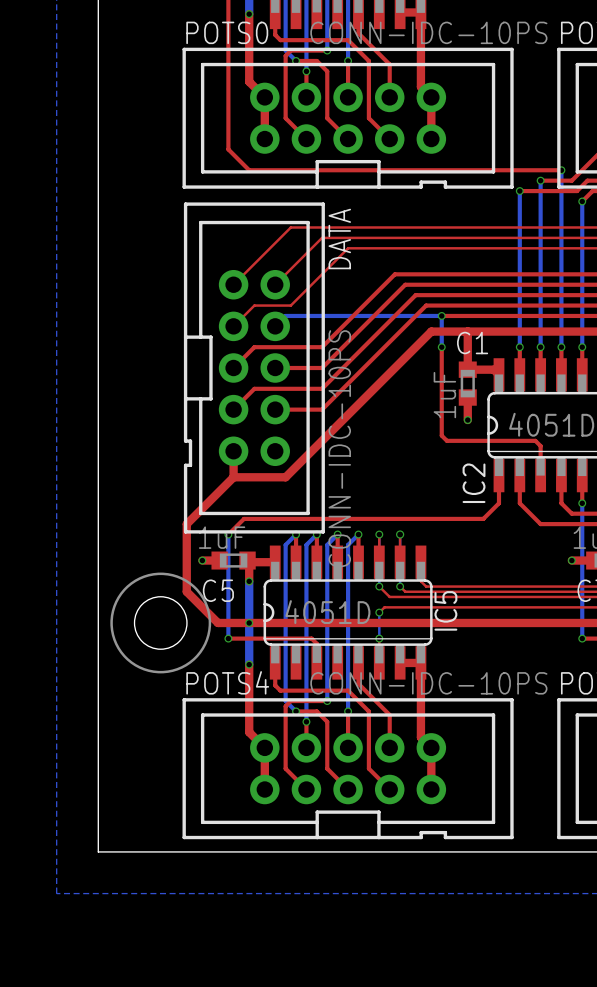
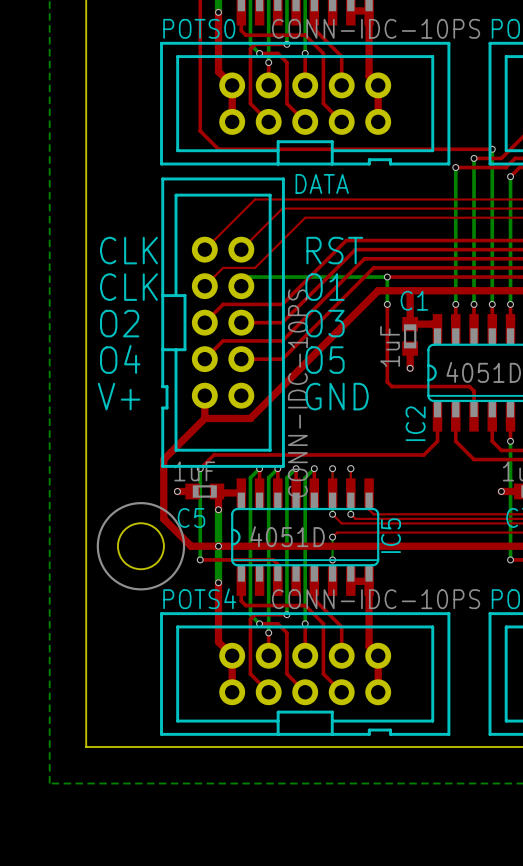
DATA name rotation: 0° (339, 239) -> 90° clockwise (322, 183)
text: none -> CLK (128, 250)
text: none -> RST (334, 250)
text: none -> CLK (128, 287)
text: none -> O1 (324, 287)
text: none -> O2 (119, 323)
text: none -> O3 (324, 323)
text: none -> O4 (120, 359)
text: none -> O5 (324, 360)
text: none -> V+ (119, 396)
text: none -> GND (337, 396)

